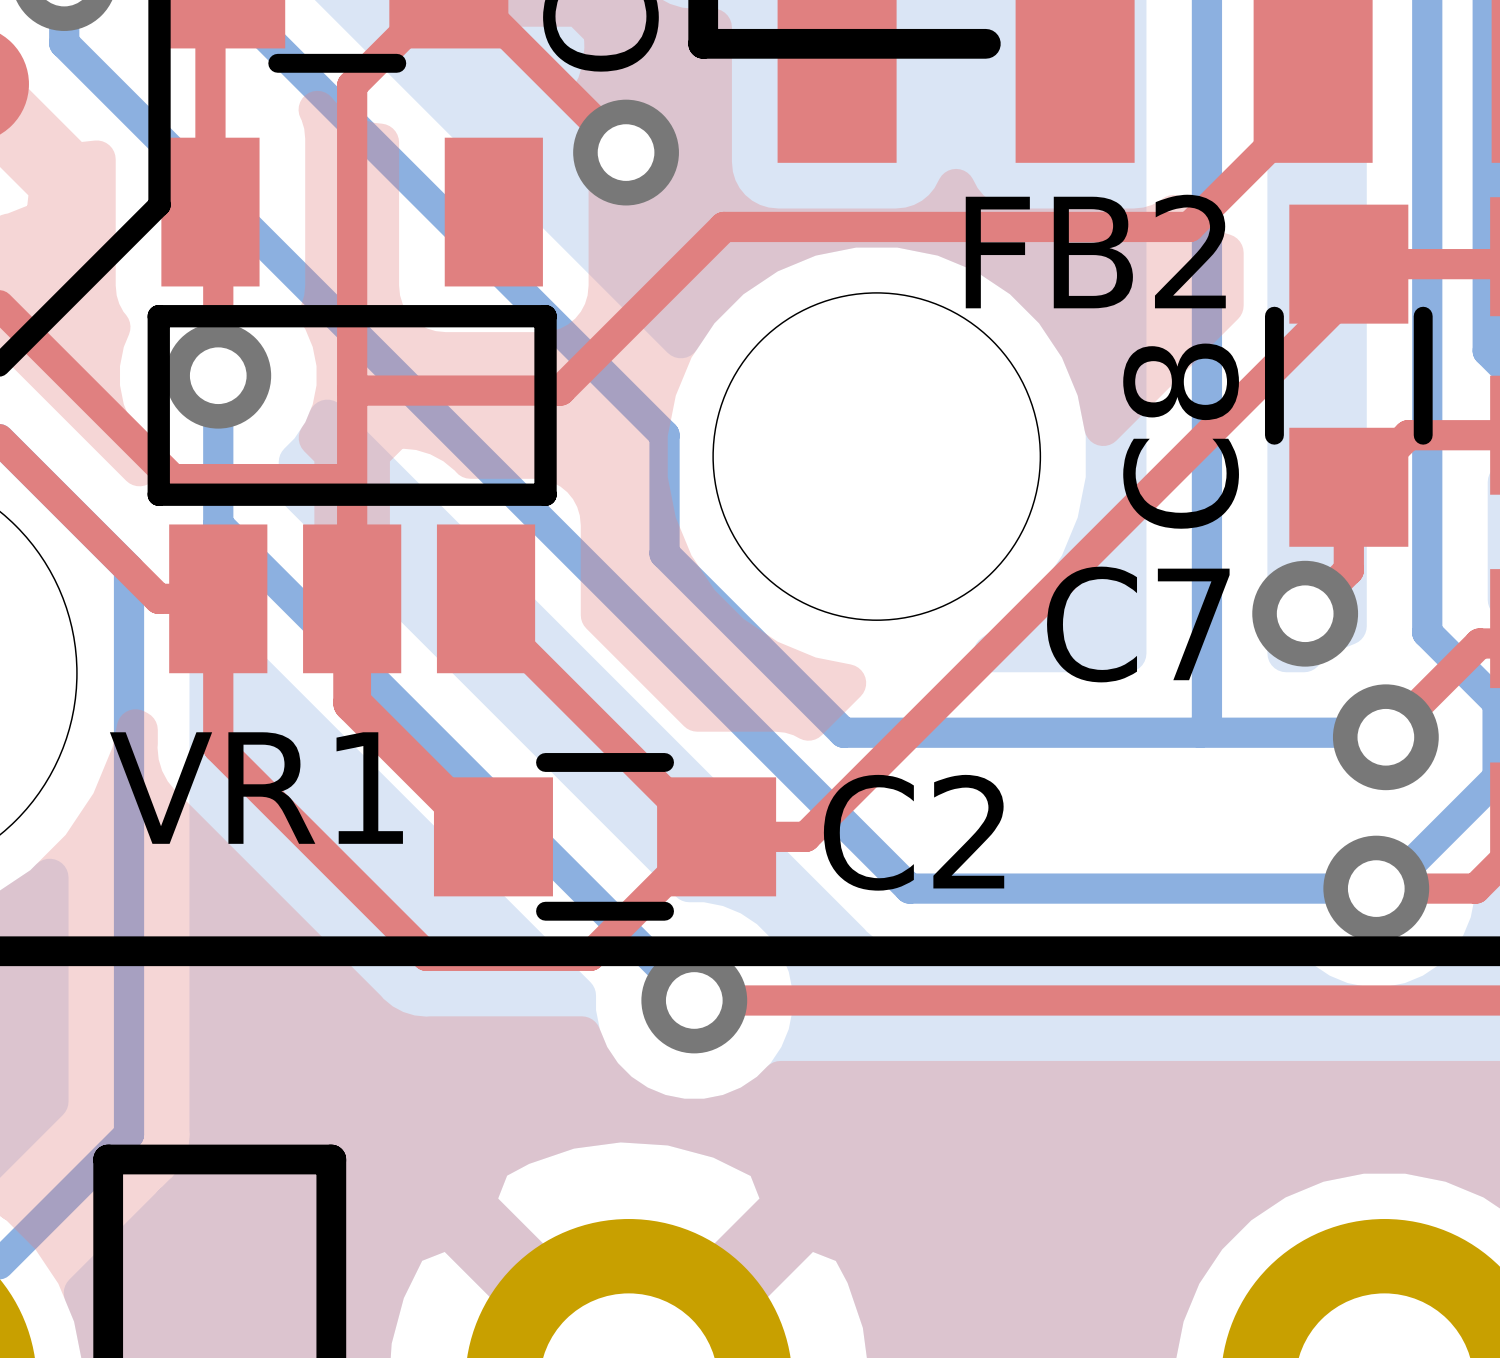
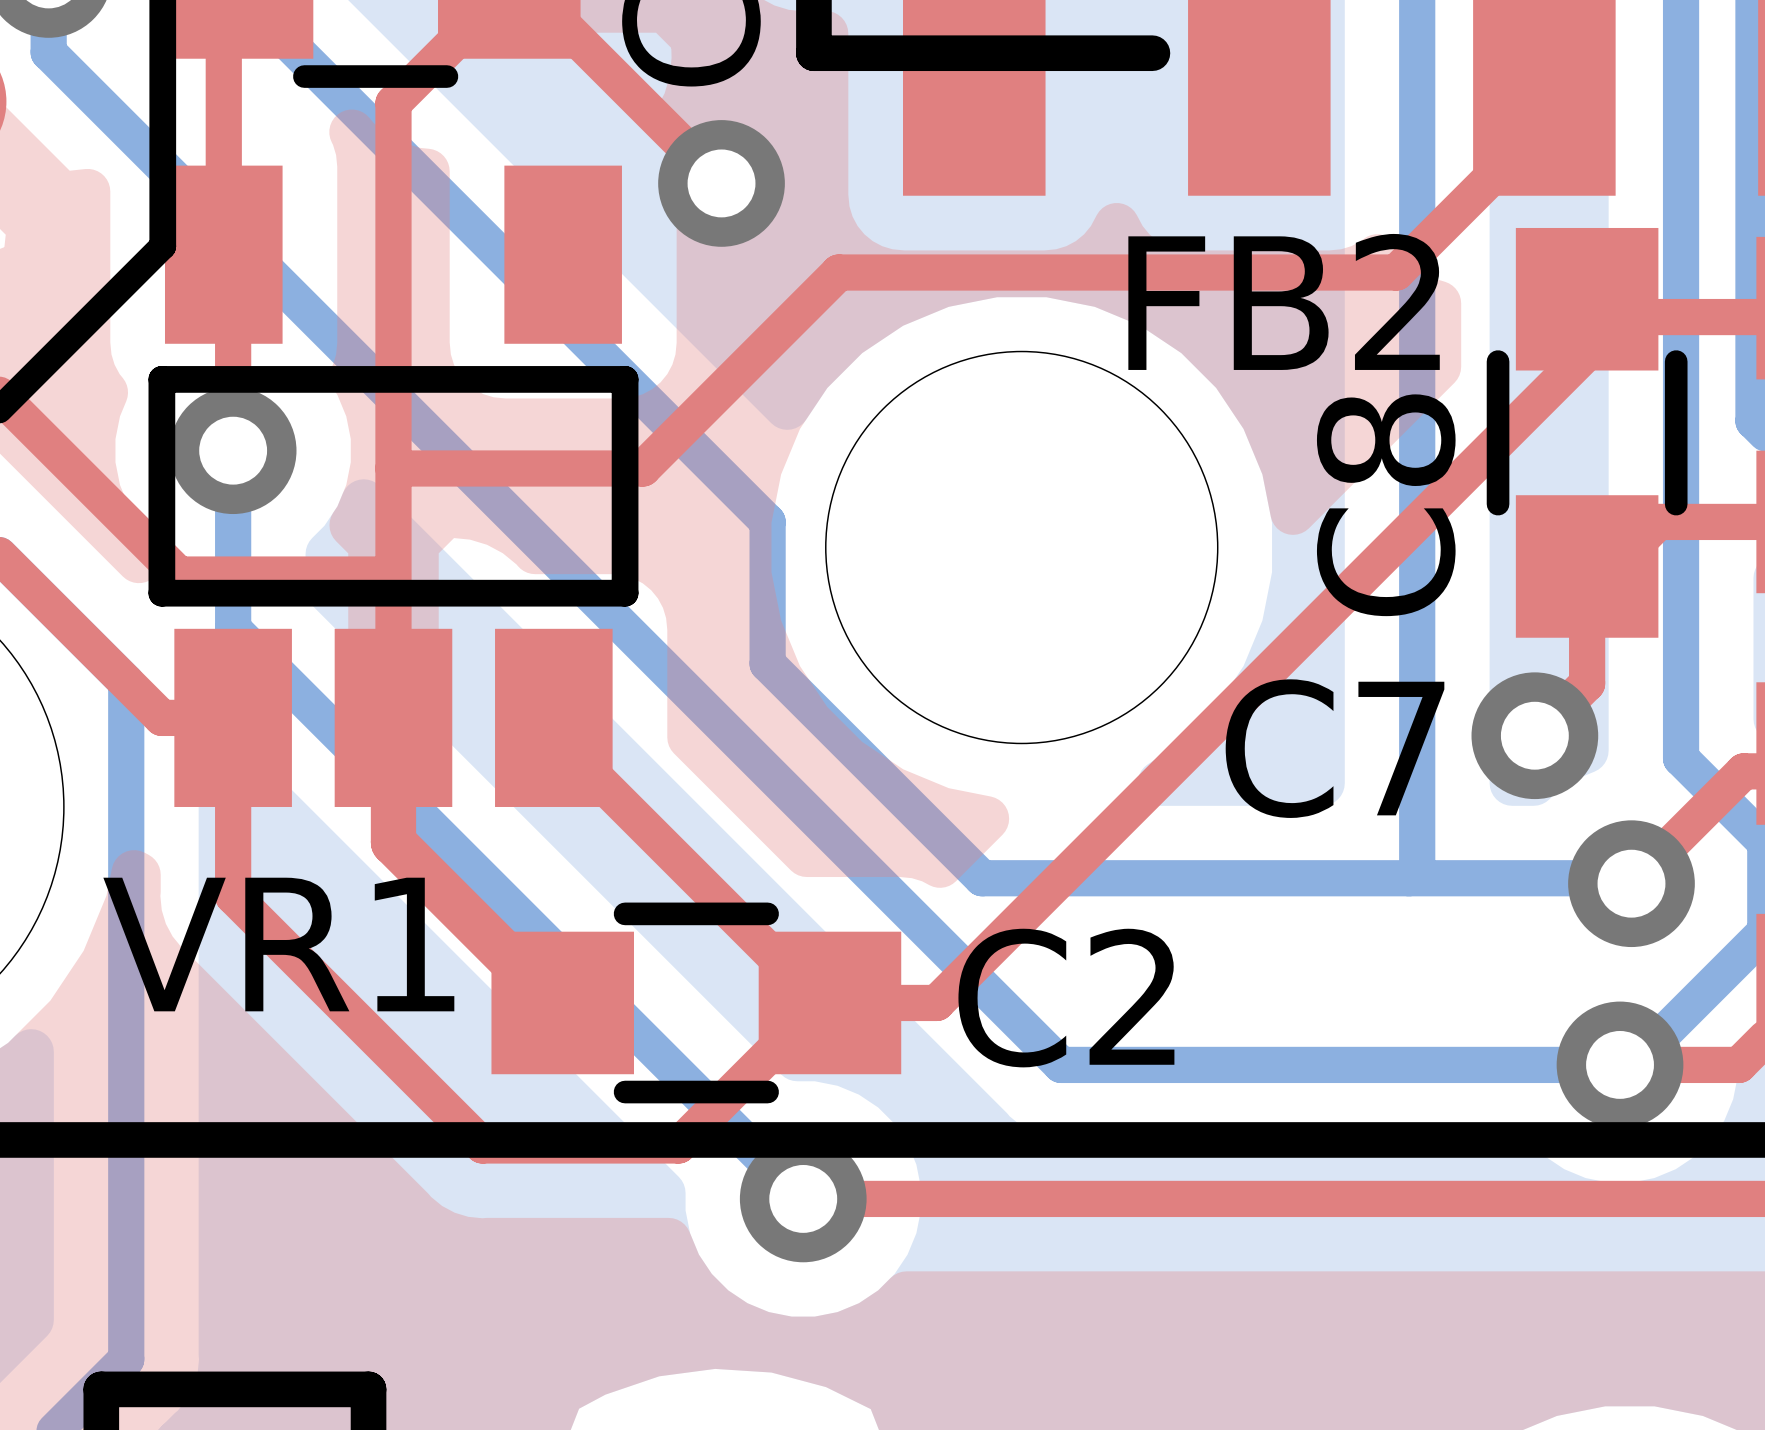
C8 position: (1348, 375) -> (1587, 432)

